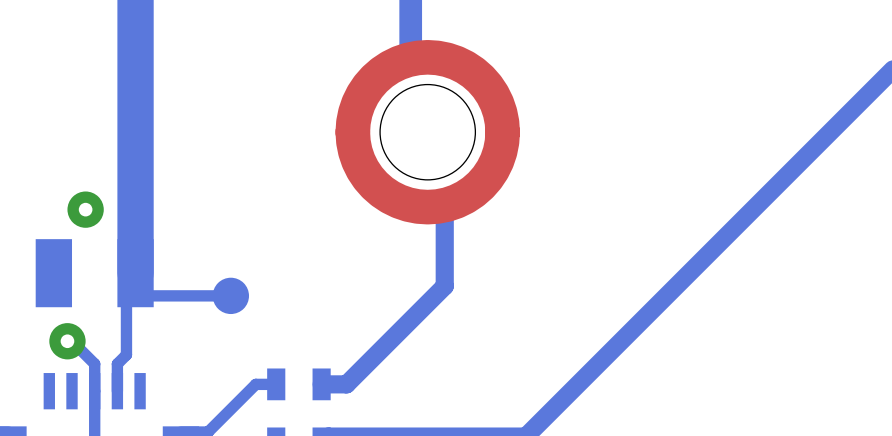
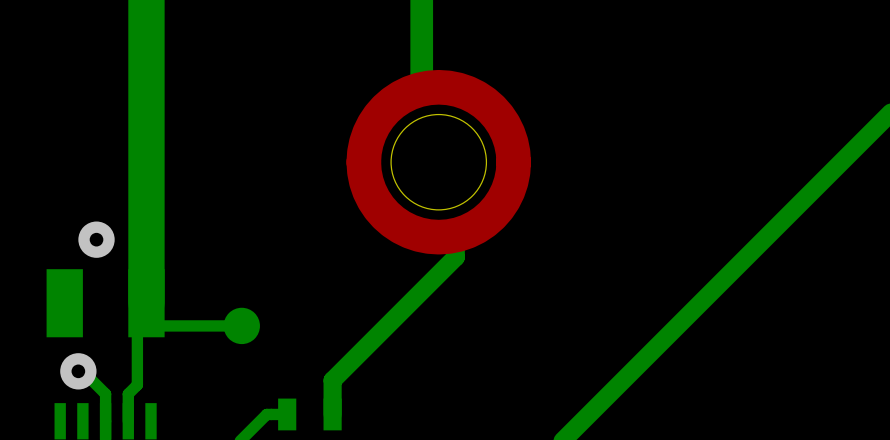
bottom track: (444, 227) (444, 286) (346, 384) (321, 384) -> (455, 257) (332, 380) (332, 414)

